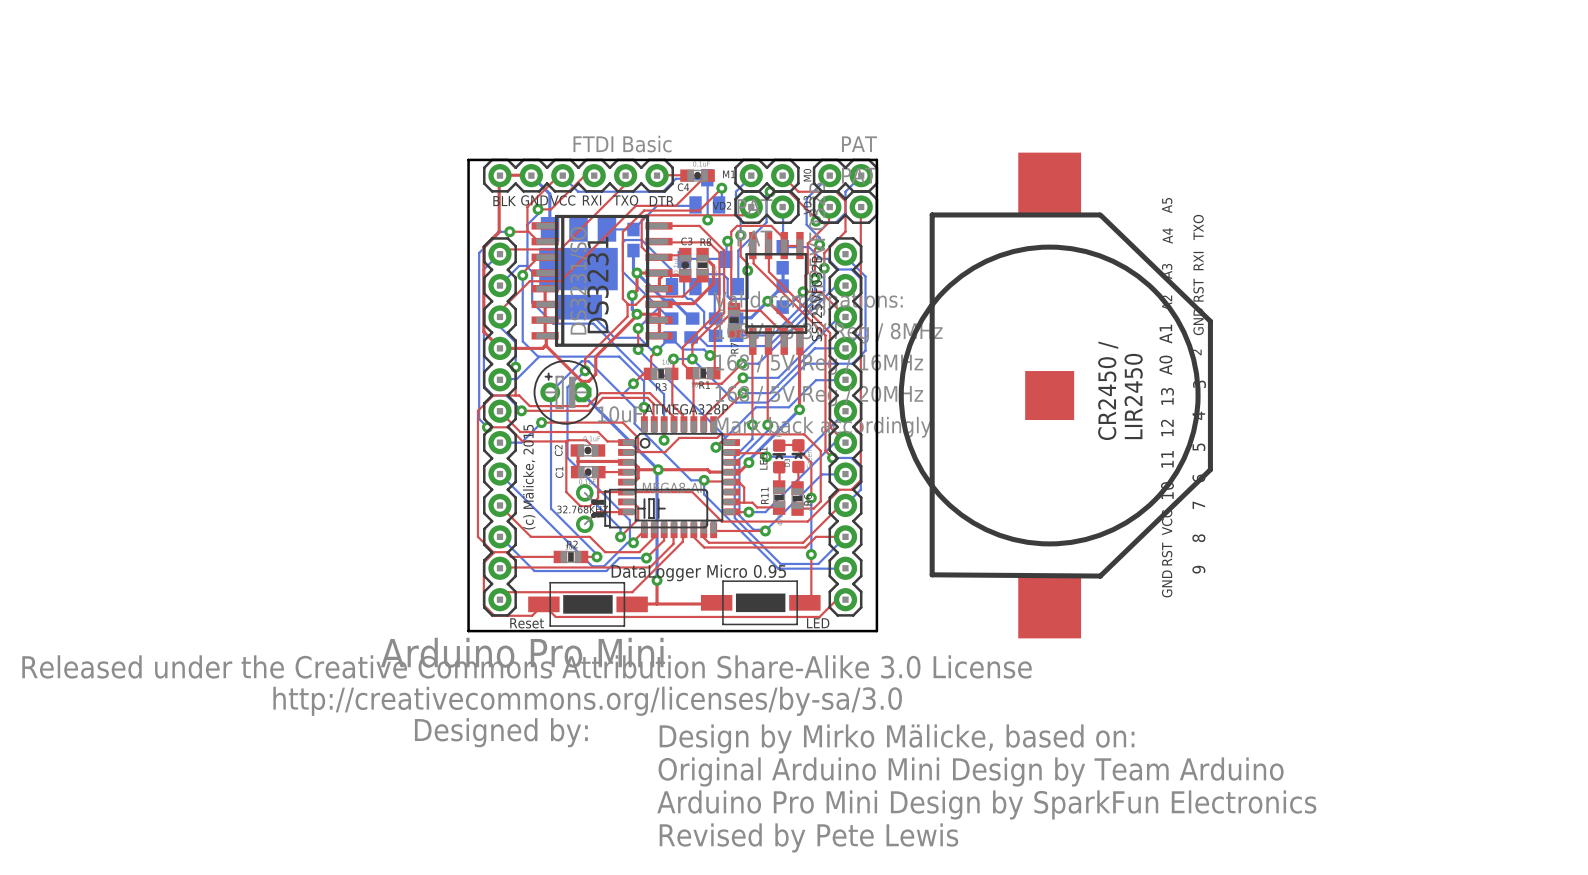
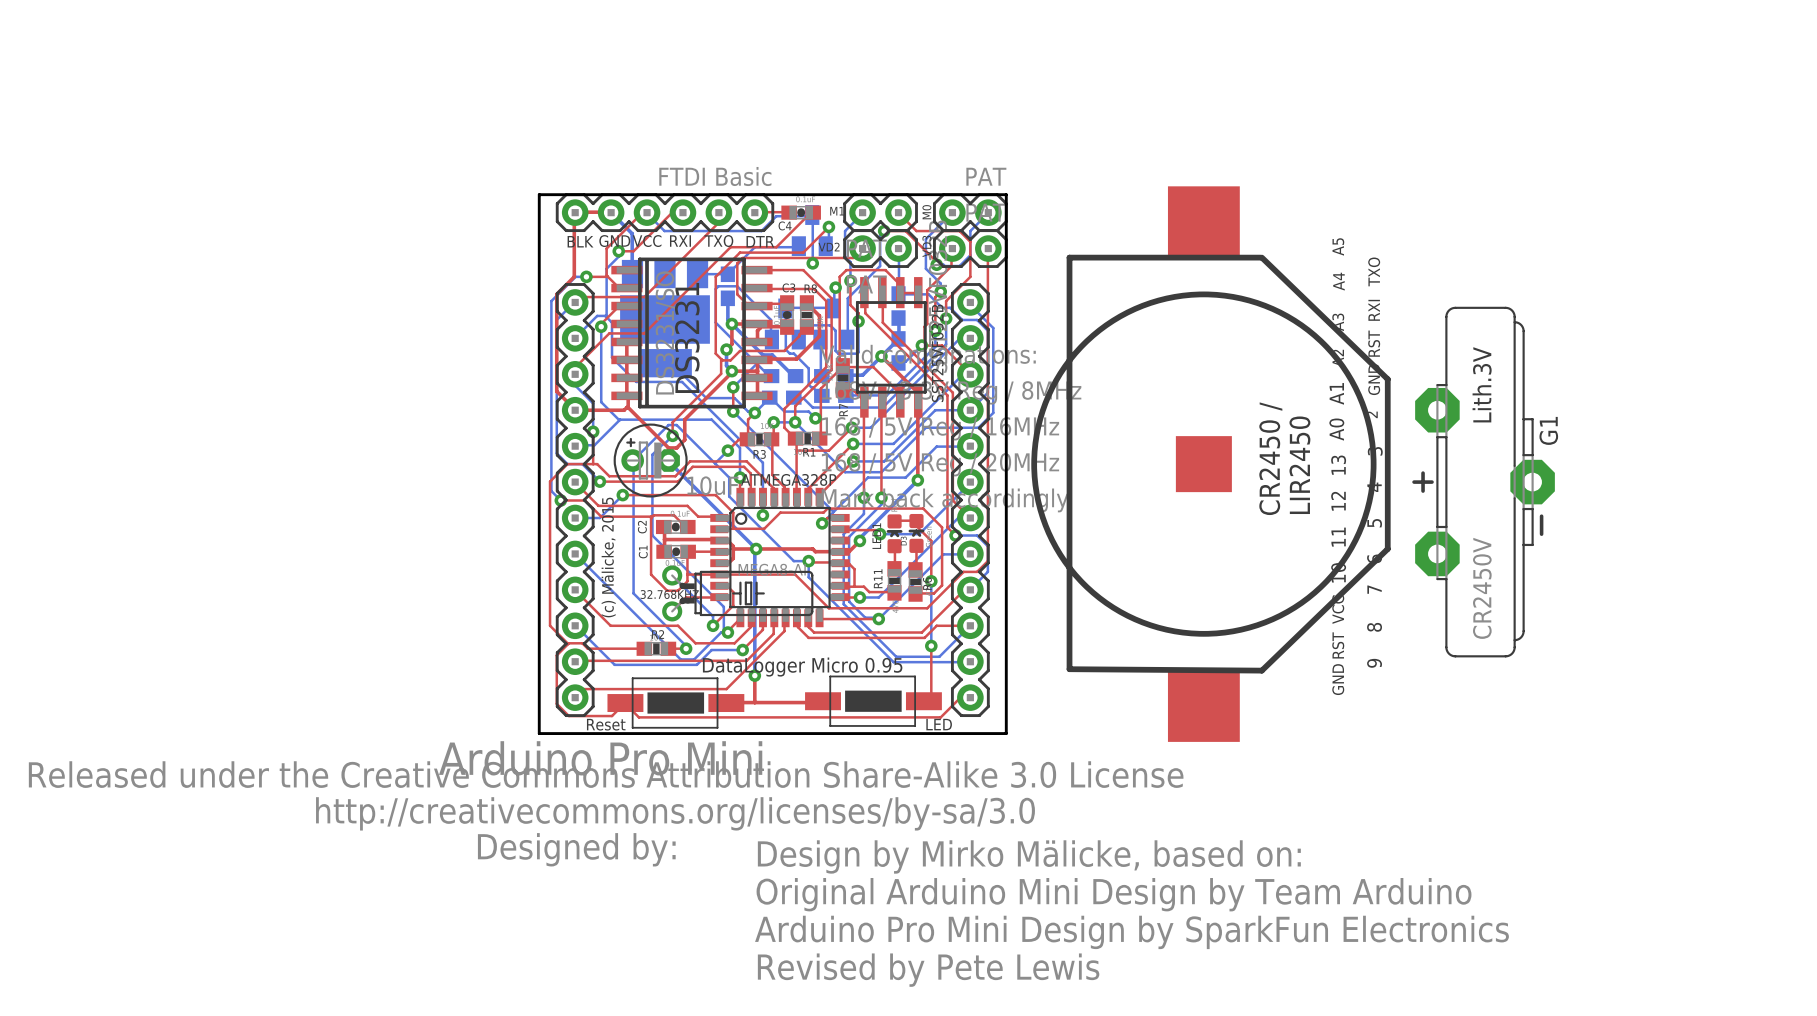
G1: none -> CR2450V (1483, 482)

